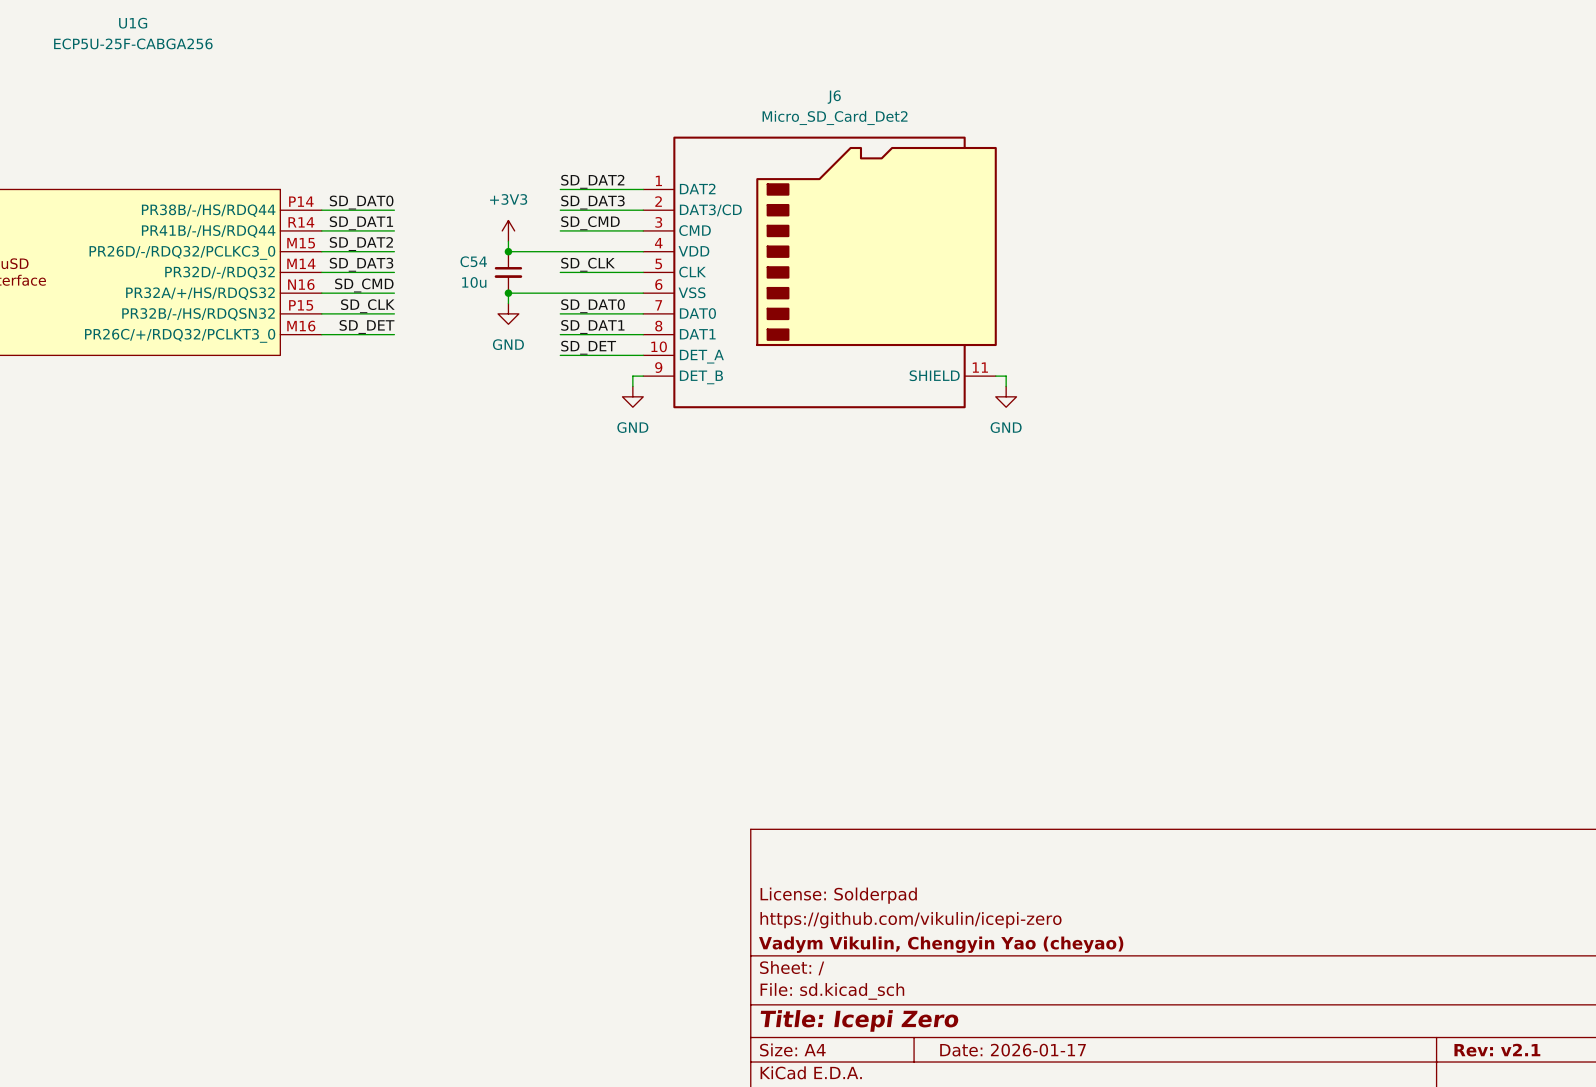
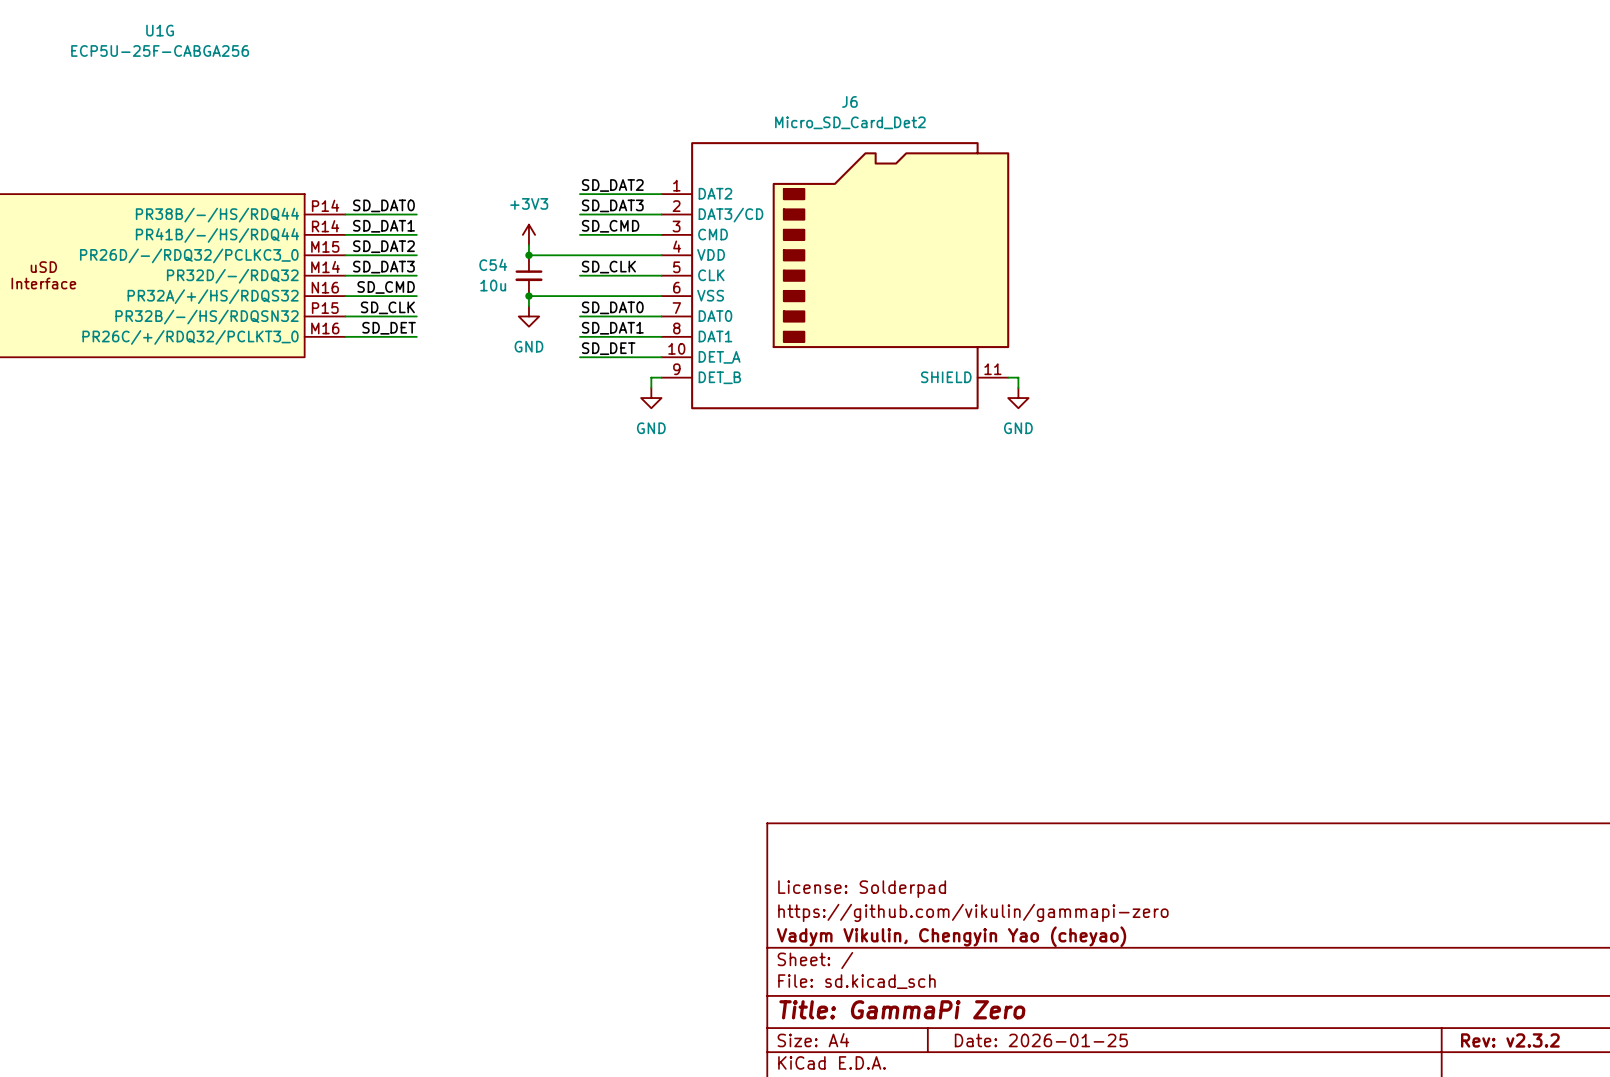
title block: https://github.com/vikulin/icepi-zero (911, 920) -> https://github.com/vikulin/gammapi-zero (973, 912)
title block: Title: Icepi Zero (859, 1020) -> Title: GammaPi Zero (902, 1009)
title block: Date: 2026-01-17 (1013, 1050) -> Date: 2026-01-25 (1041, 1040)
title block: Rev: v2.1 (1497, 1050) -> Rev: v2.3.2 (1510, 1040)

